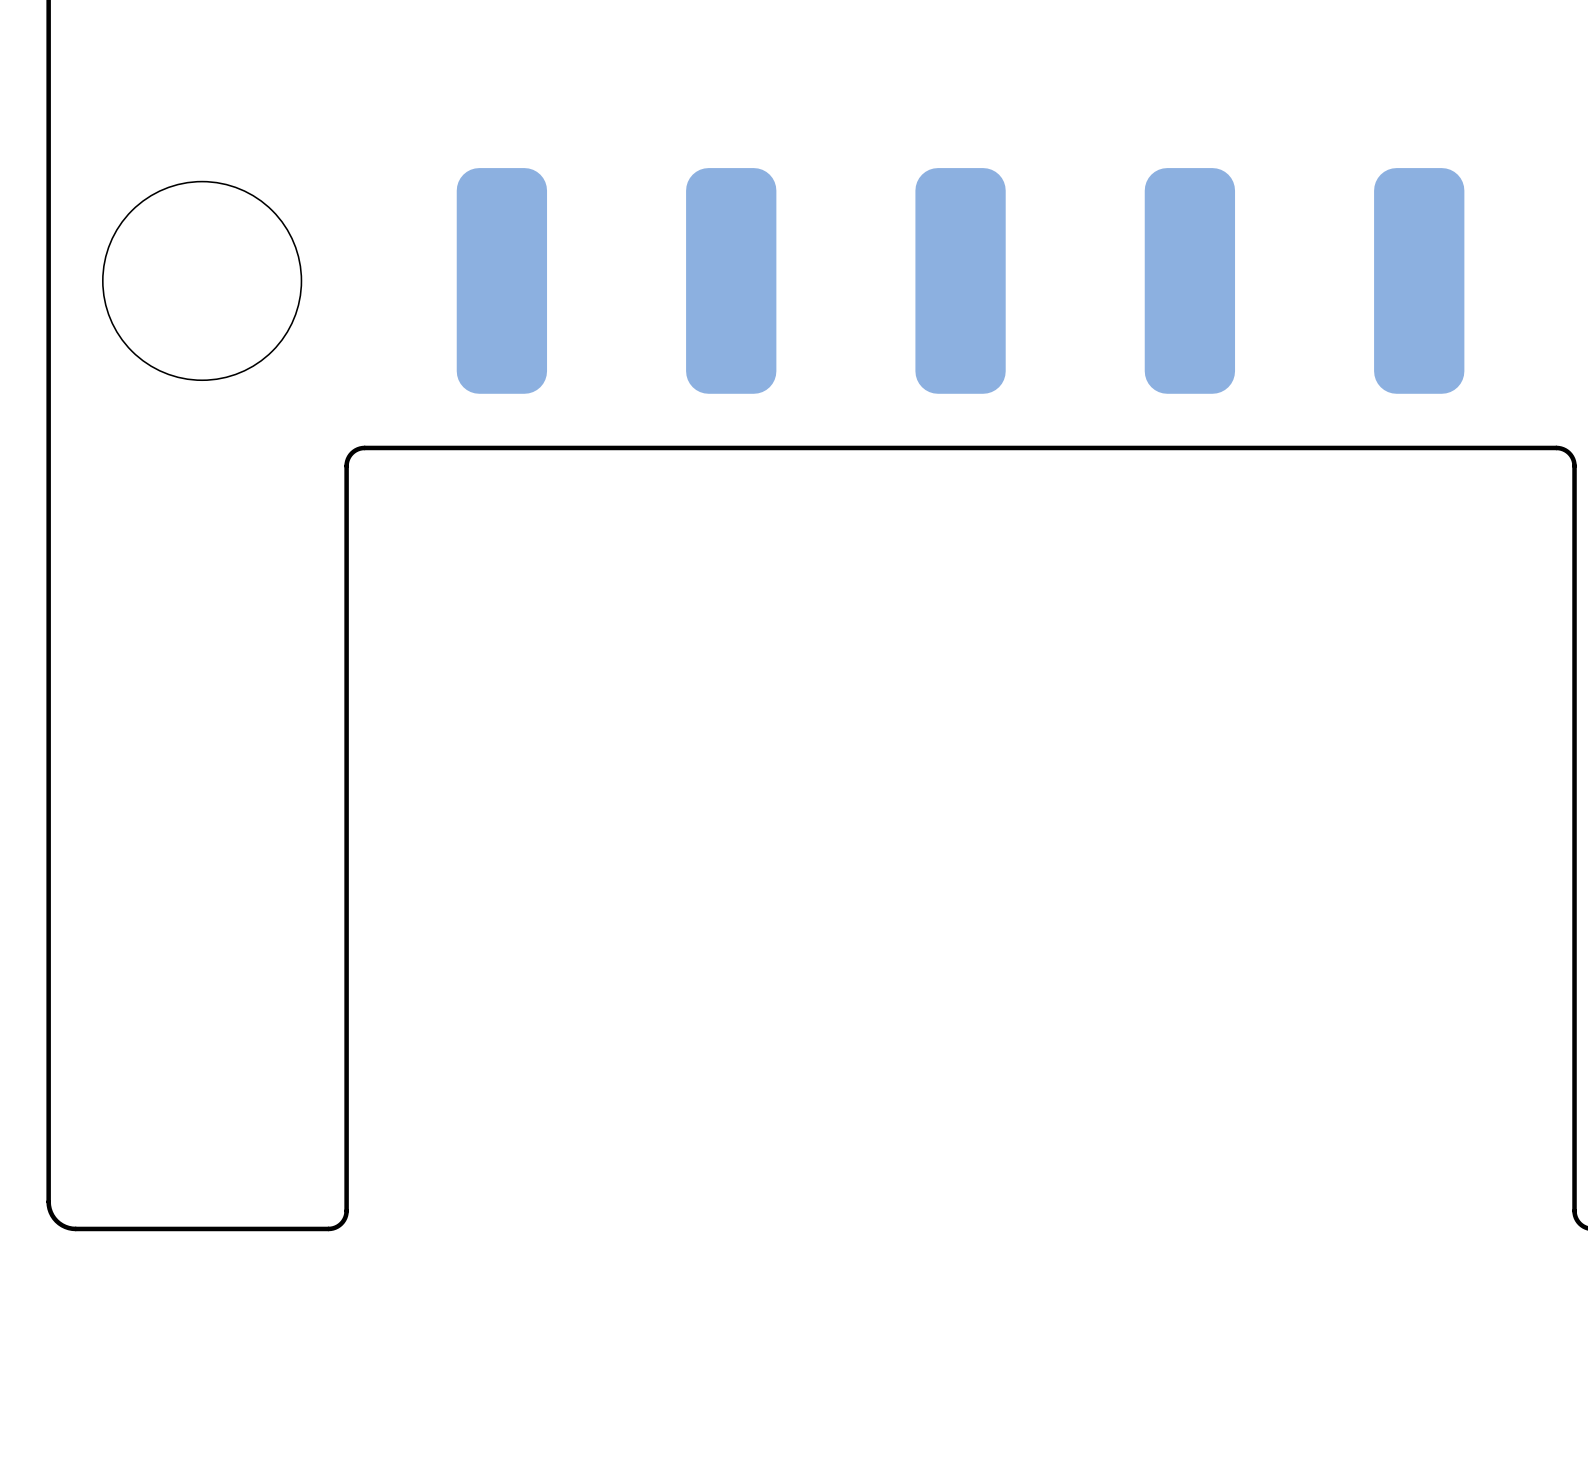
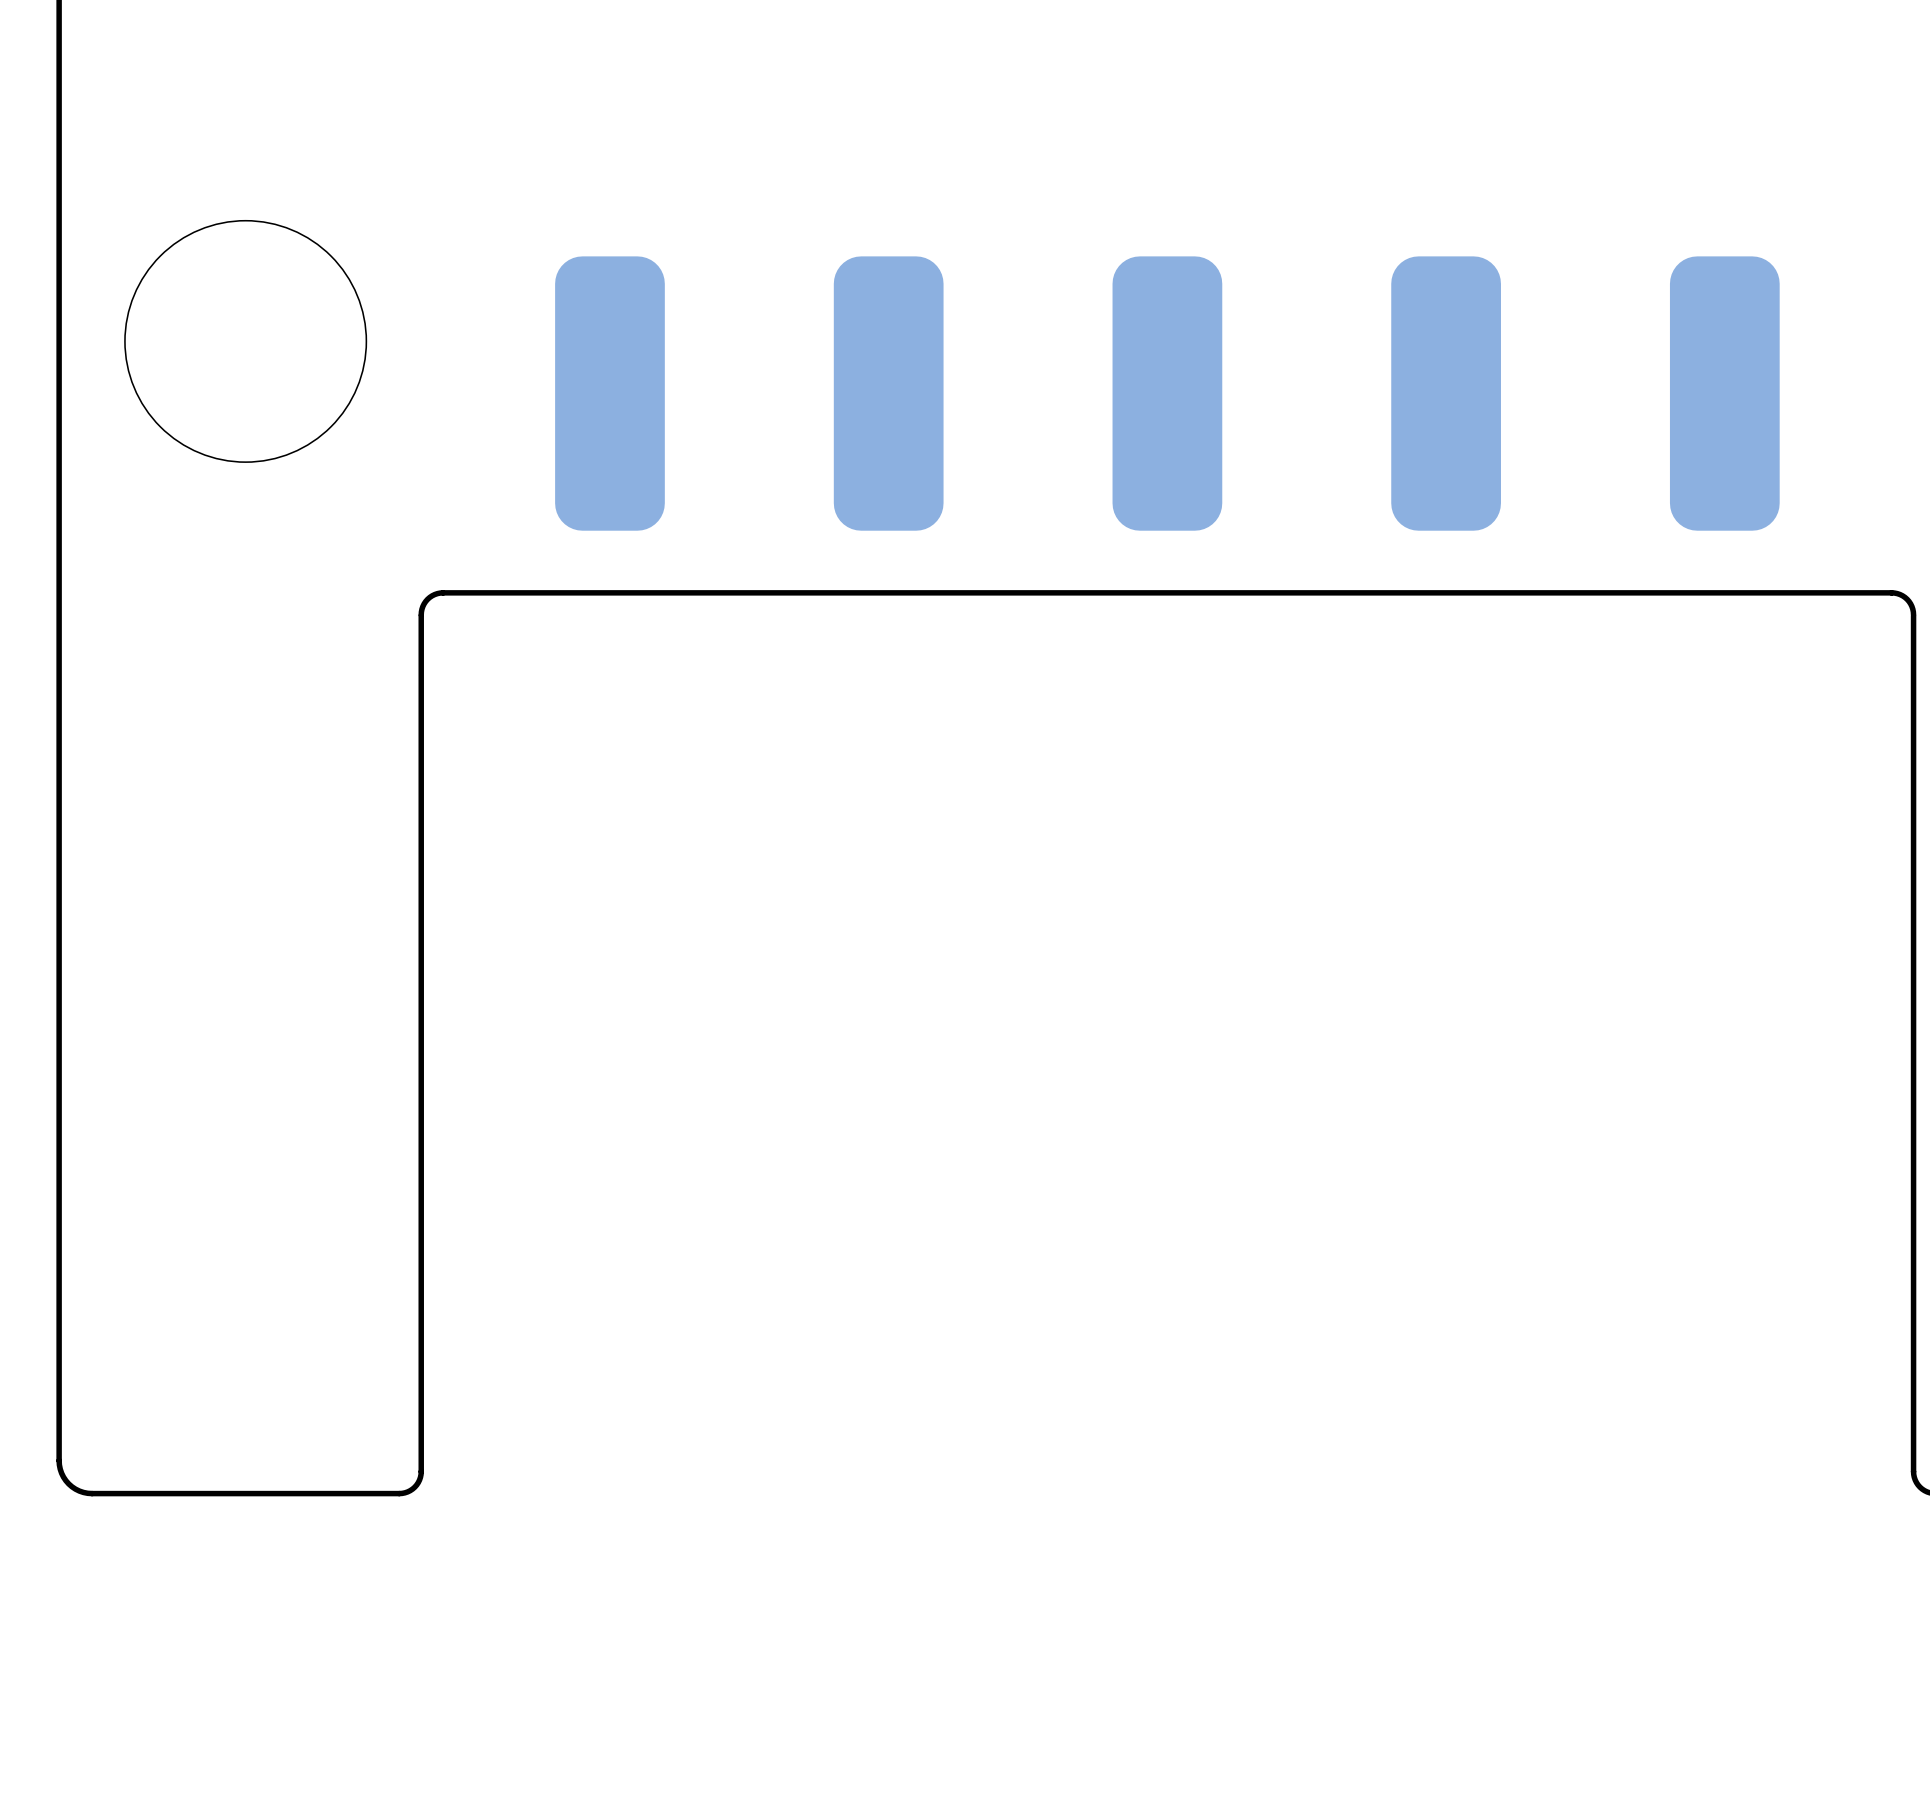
part position: (960, 280) -> (1167, 393)
board edge: (1574, 506) (1573, 461) (1567, 451) (1556, 447) (364, 447) (353, 451) (347, 461) (346, 506) -> (1913, 614) (1911, 606) (1907, 599) (1900, 594) (1891, 592) (443, 592) (434, 594) (427, 599) (422, 606) (421, 614)

